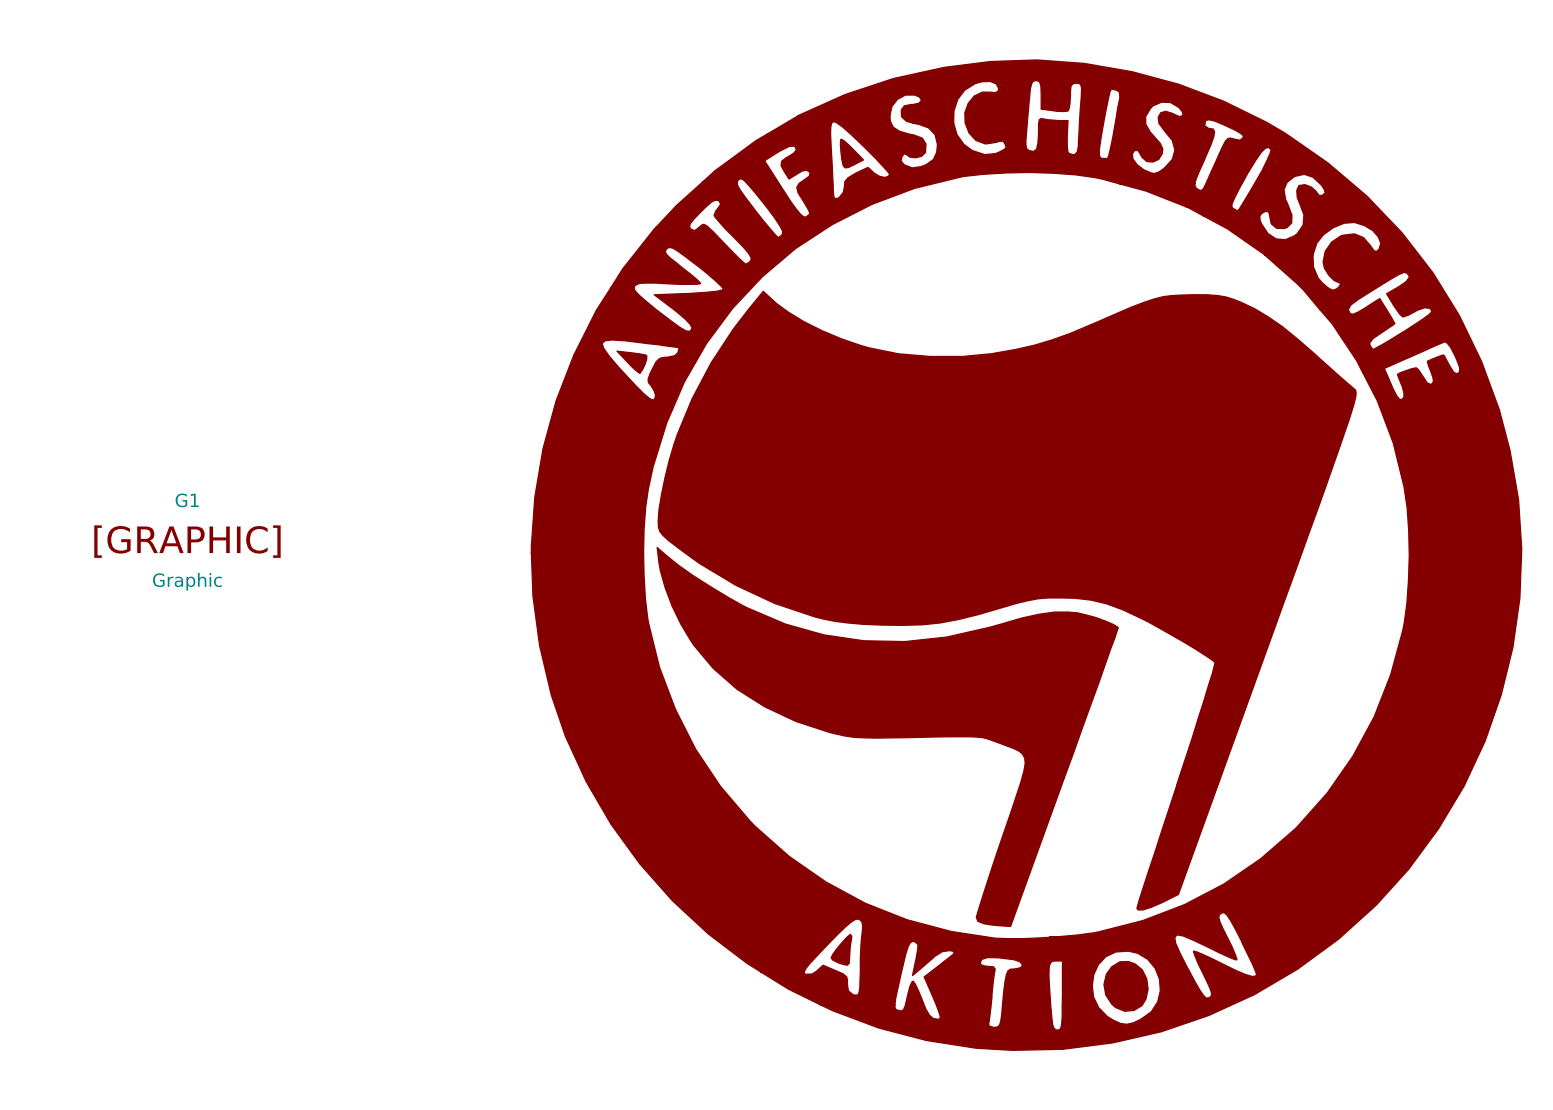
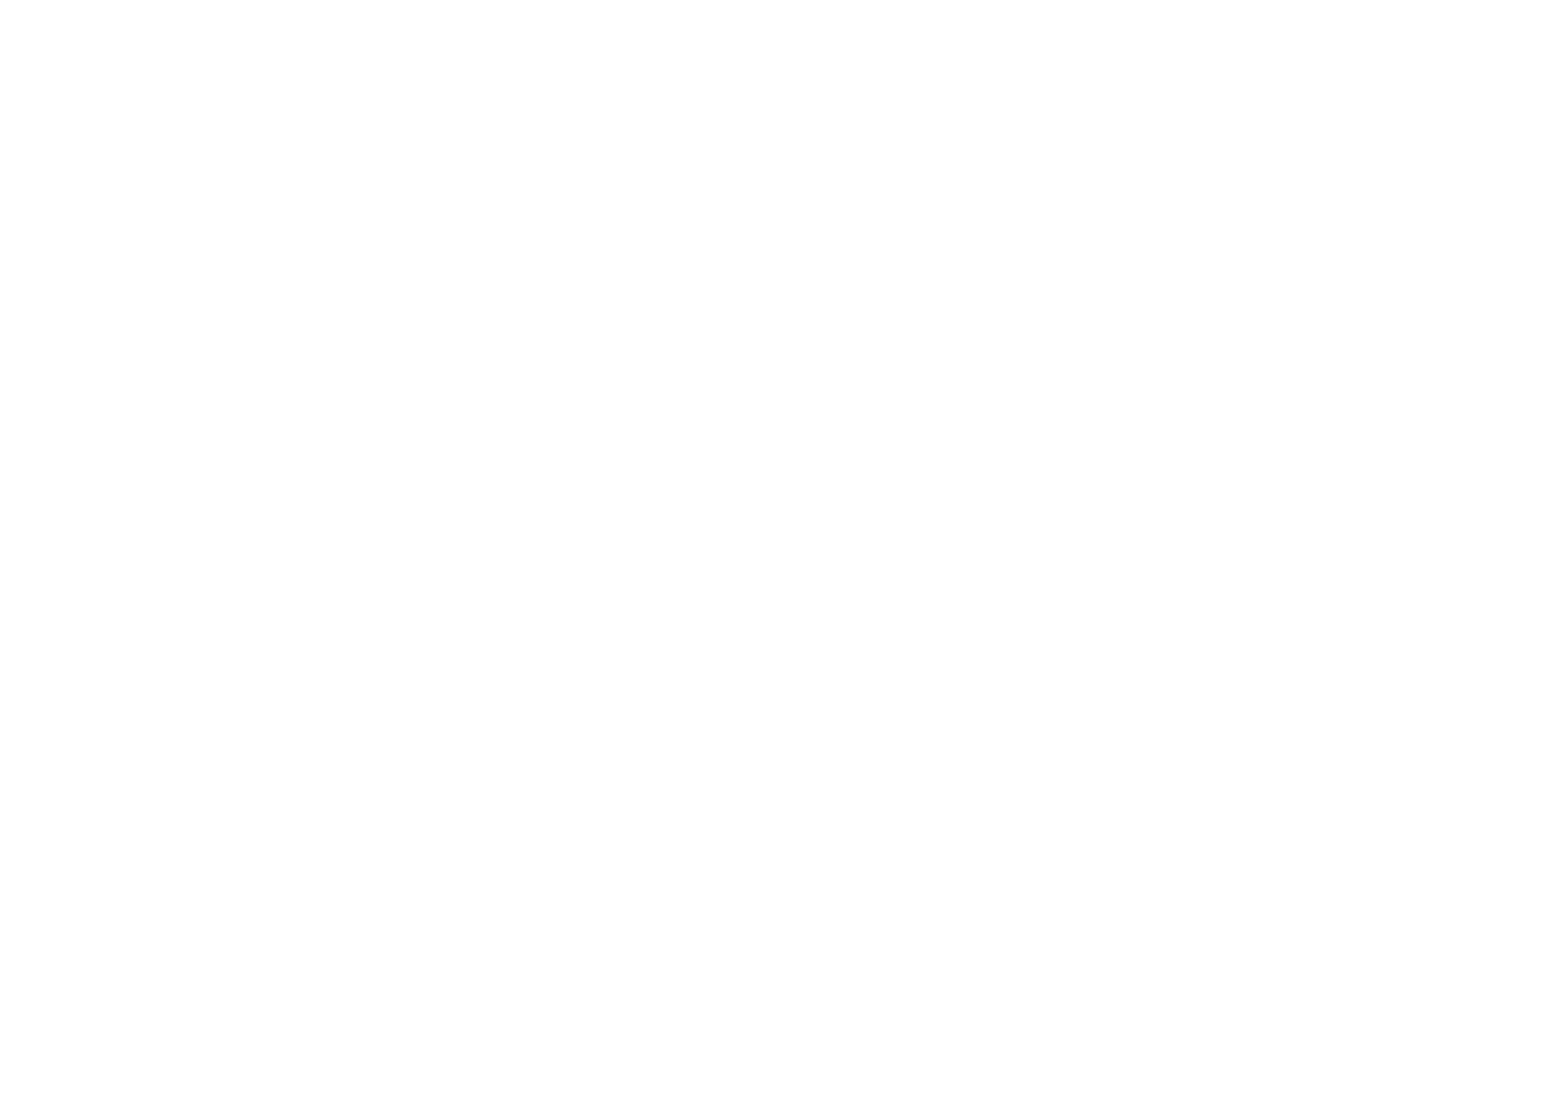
G1: Graphic (187, 542) -> none
part: (1026, 555) -> none

